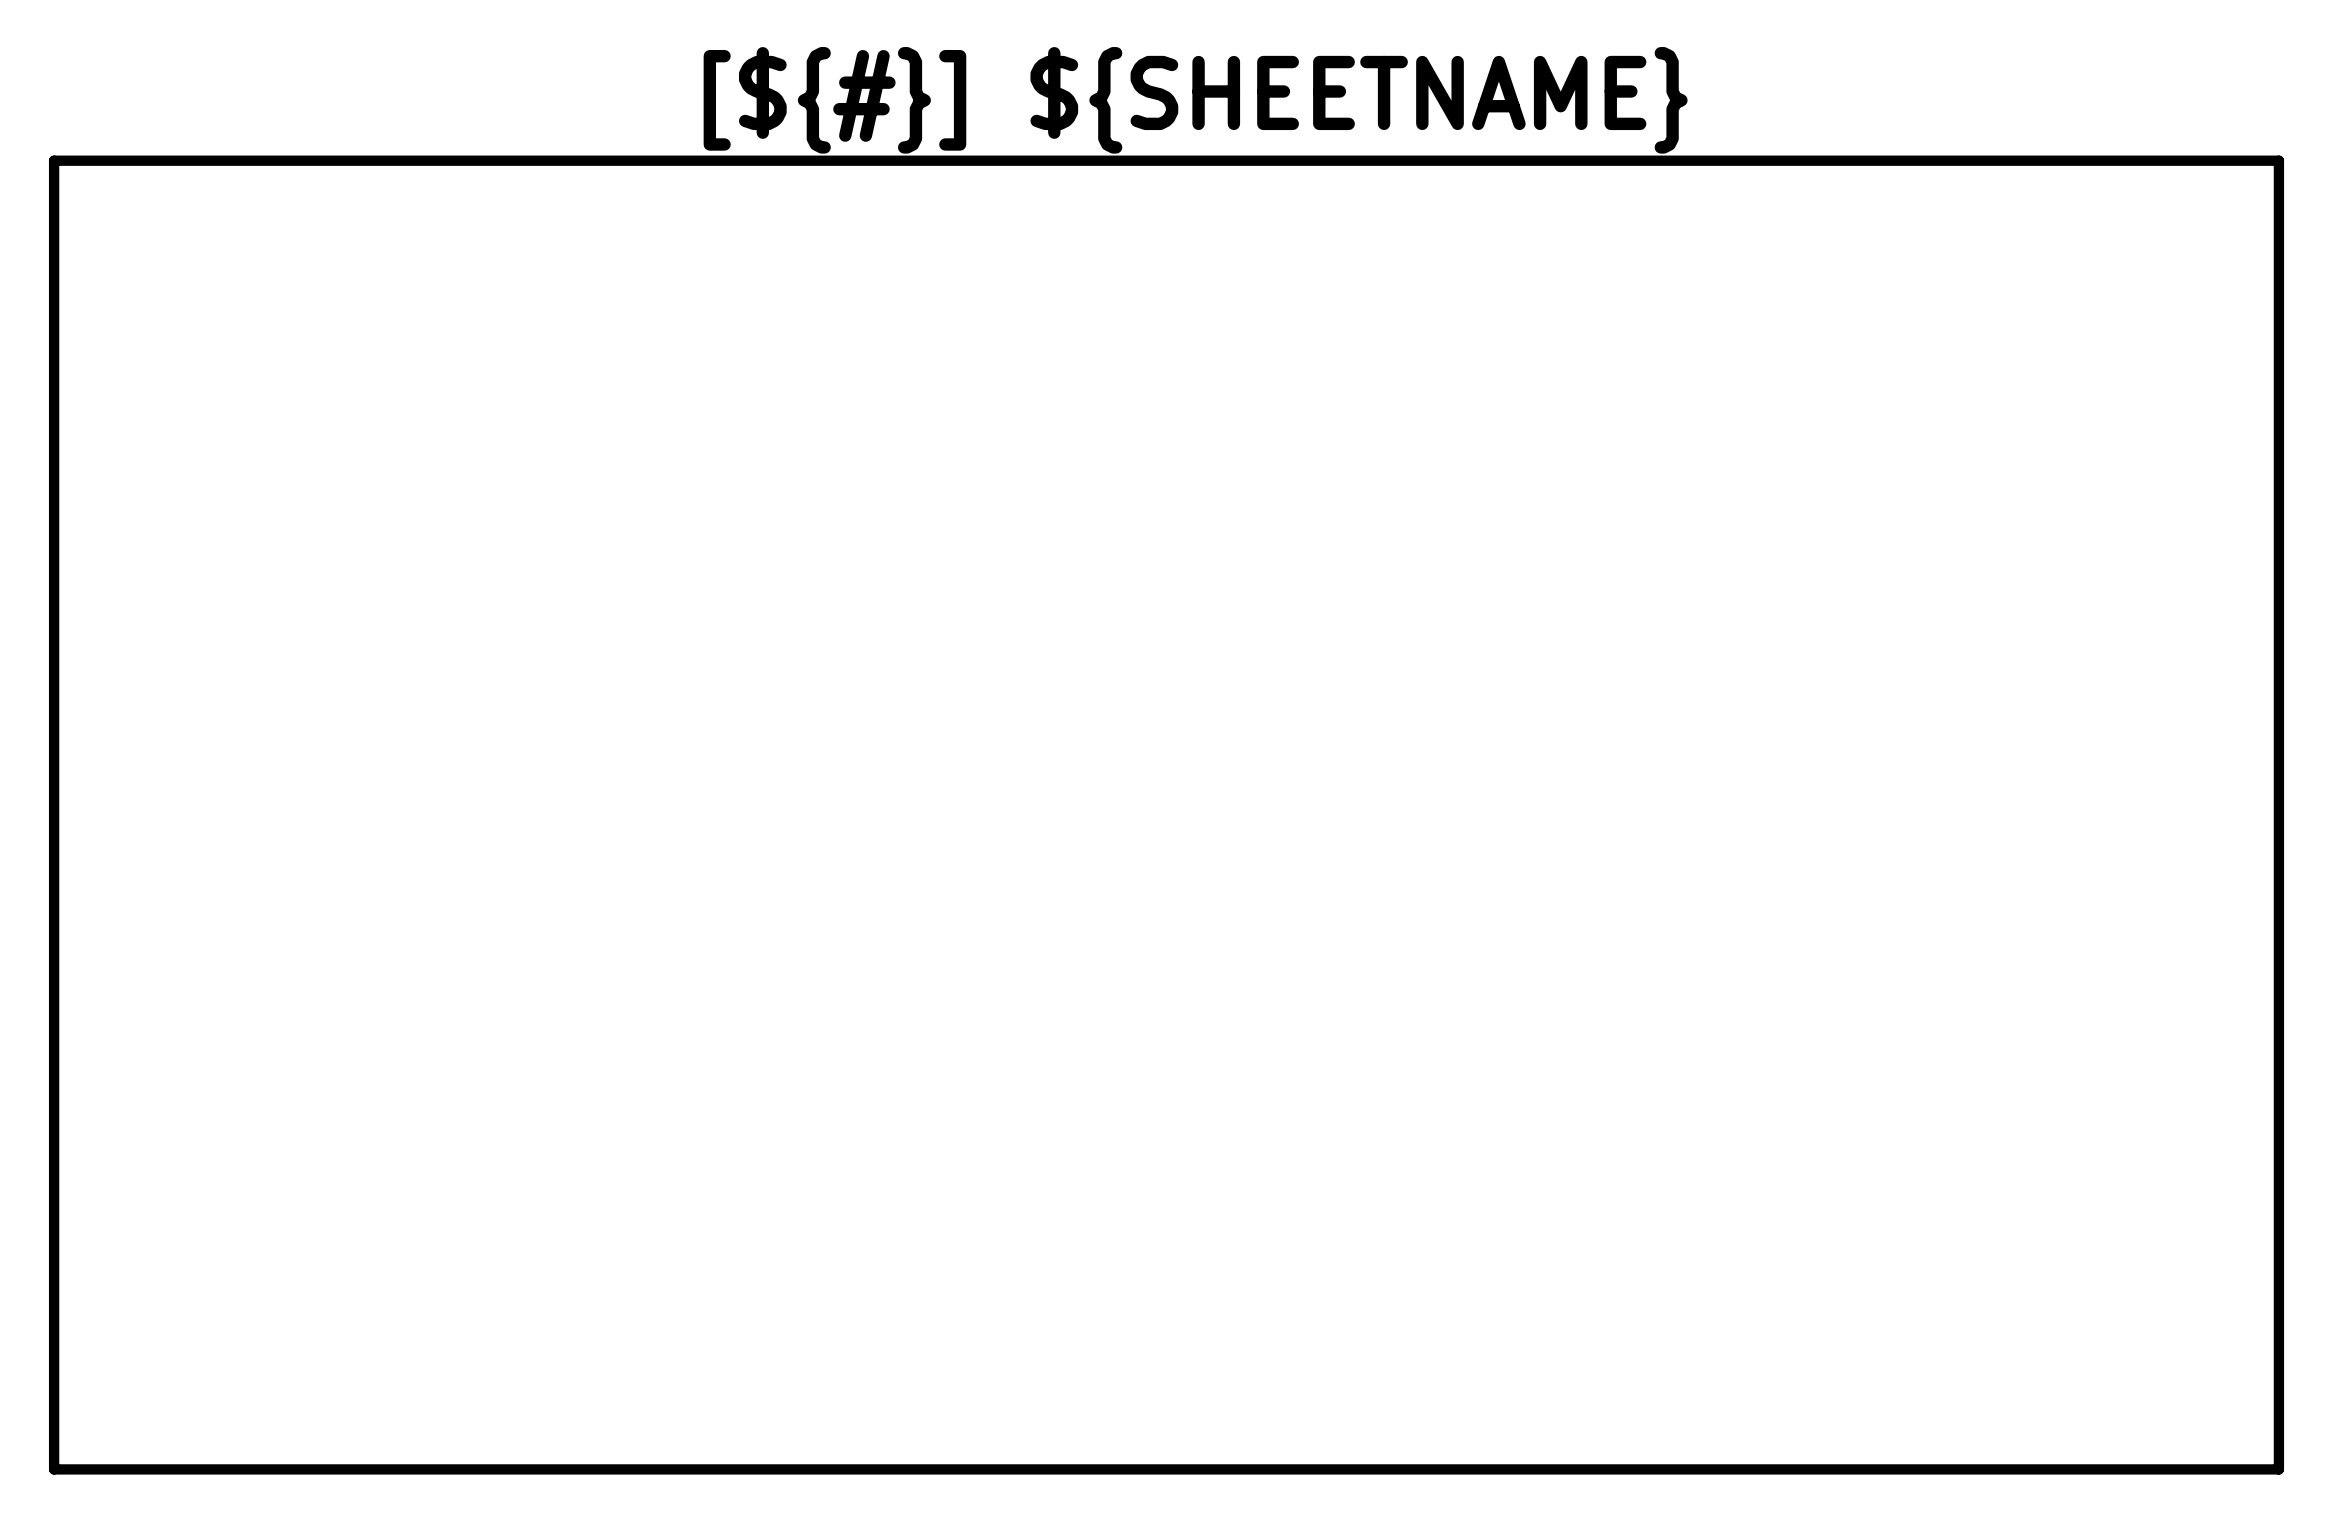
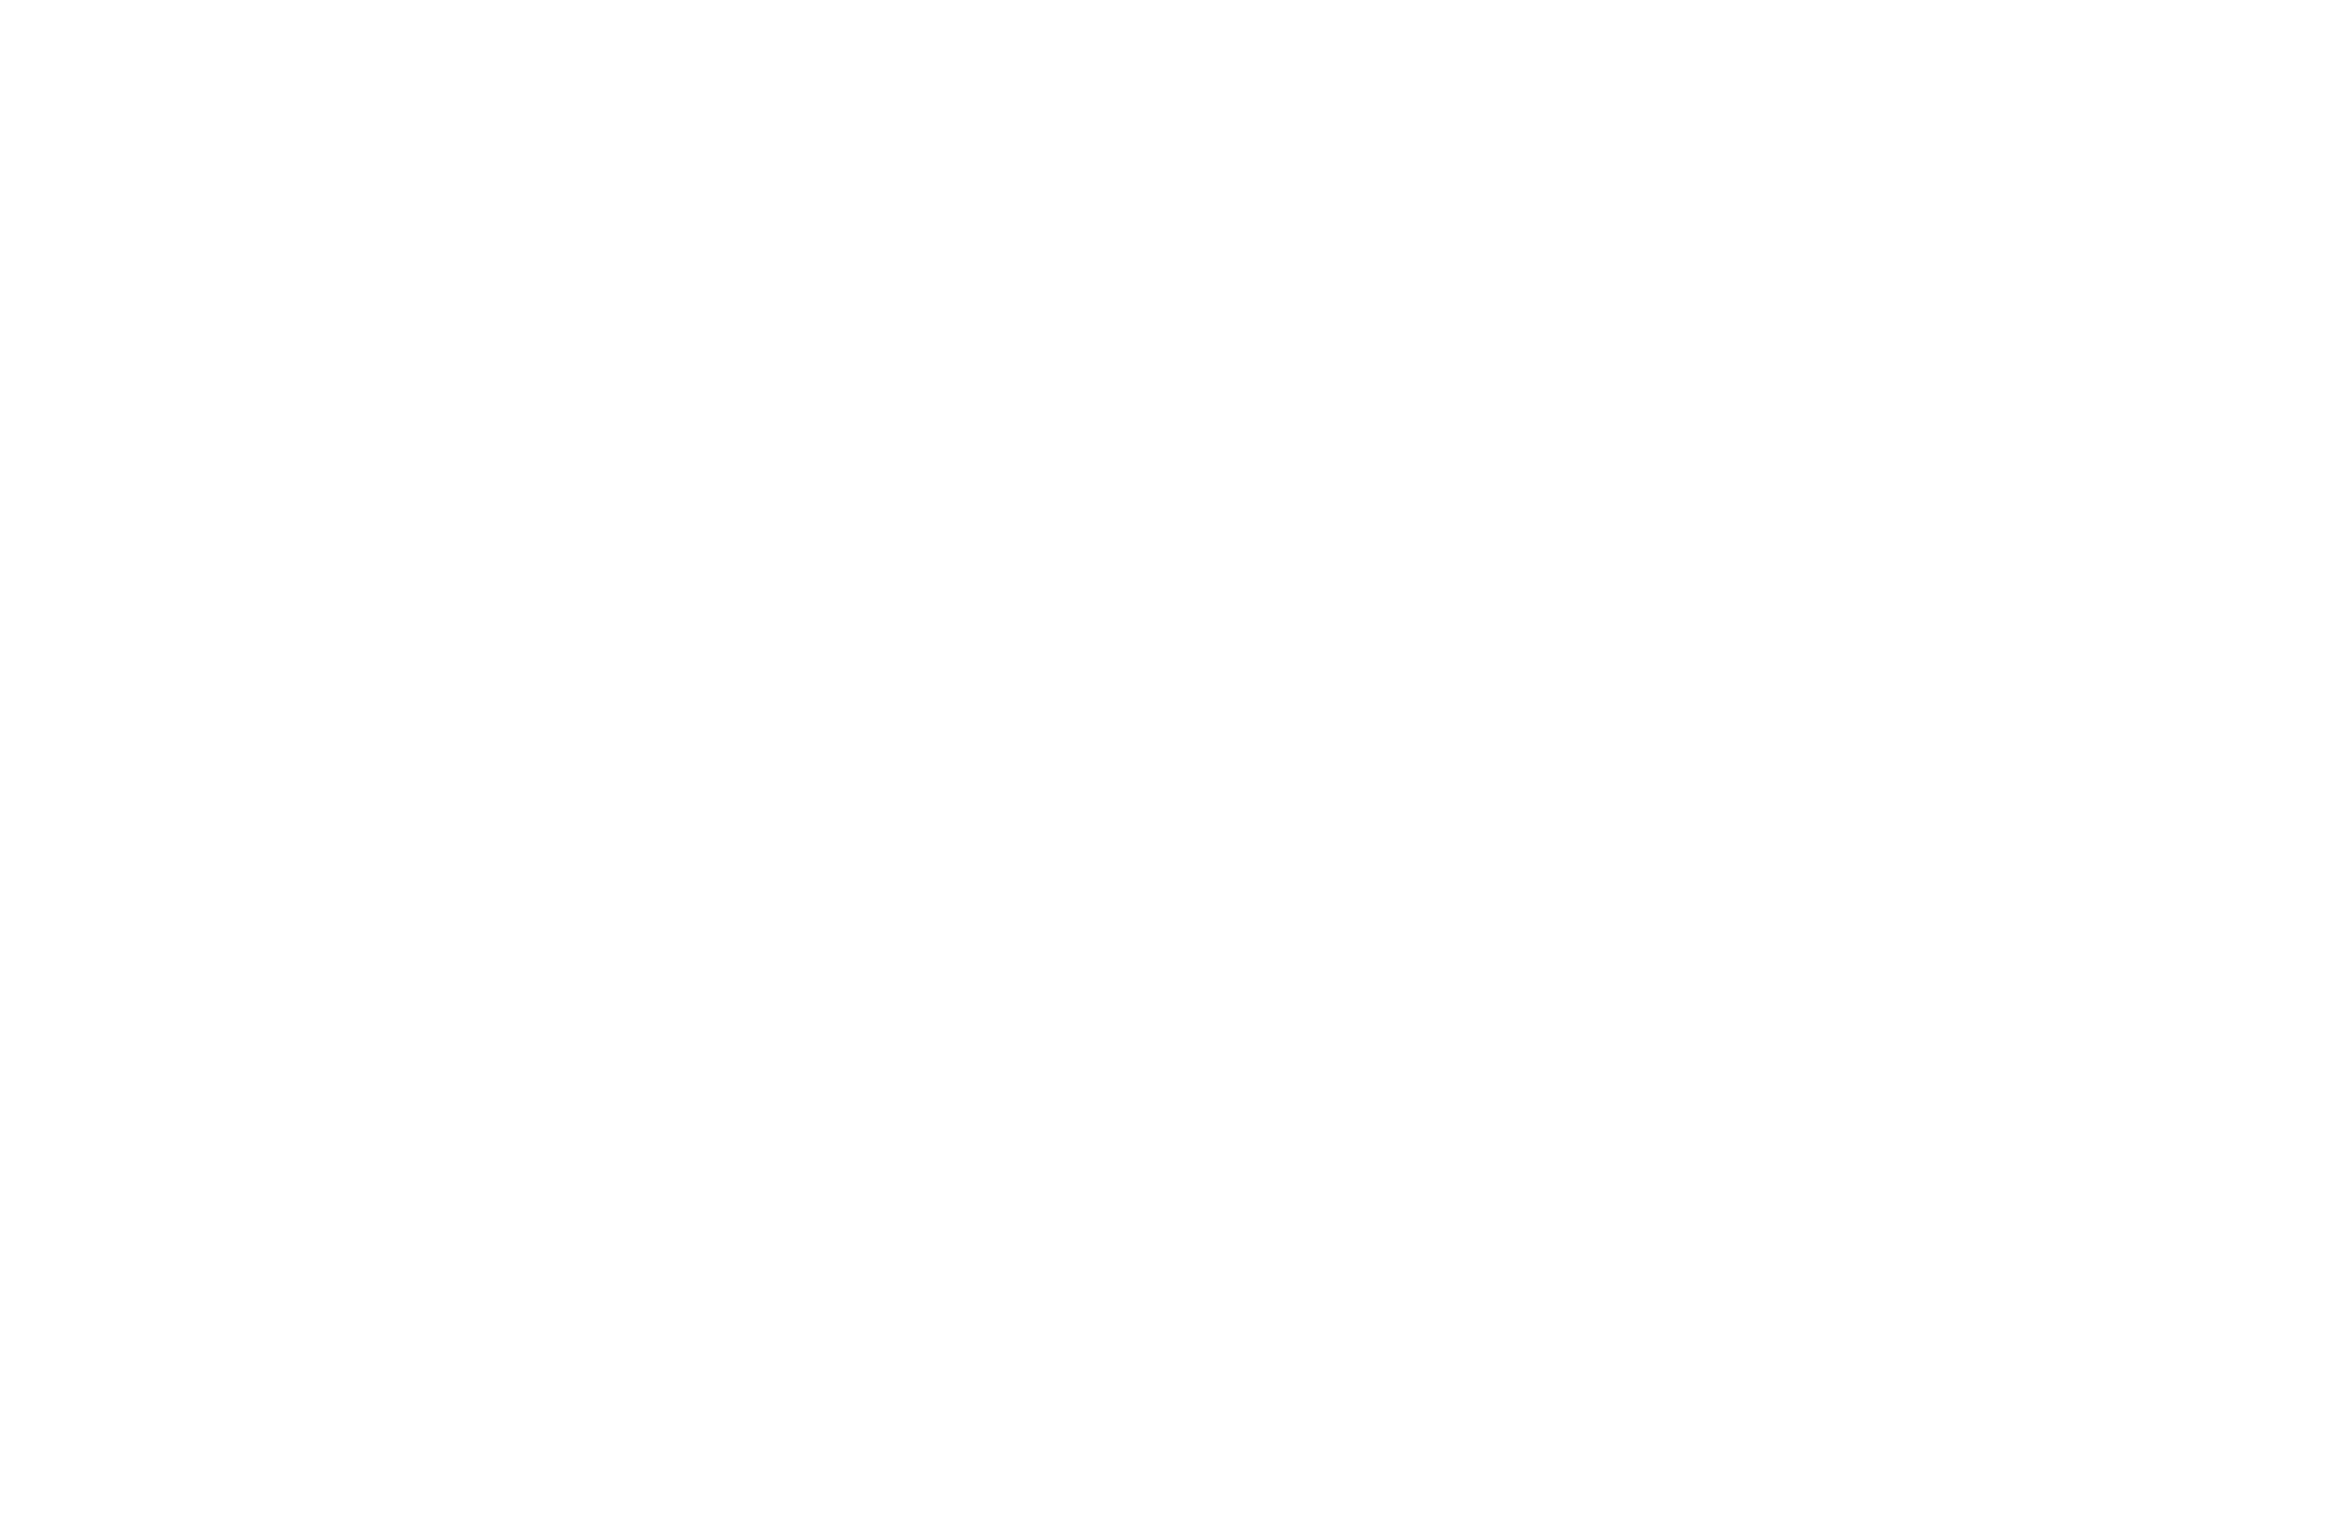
text: [${#}] ${SHEETNAME} (1195, 100) -> none
line: (54, 160) (2278, 160) (2278, 1469) (54, 1469) (54, 160) -> none

